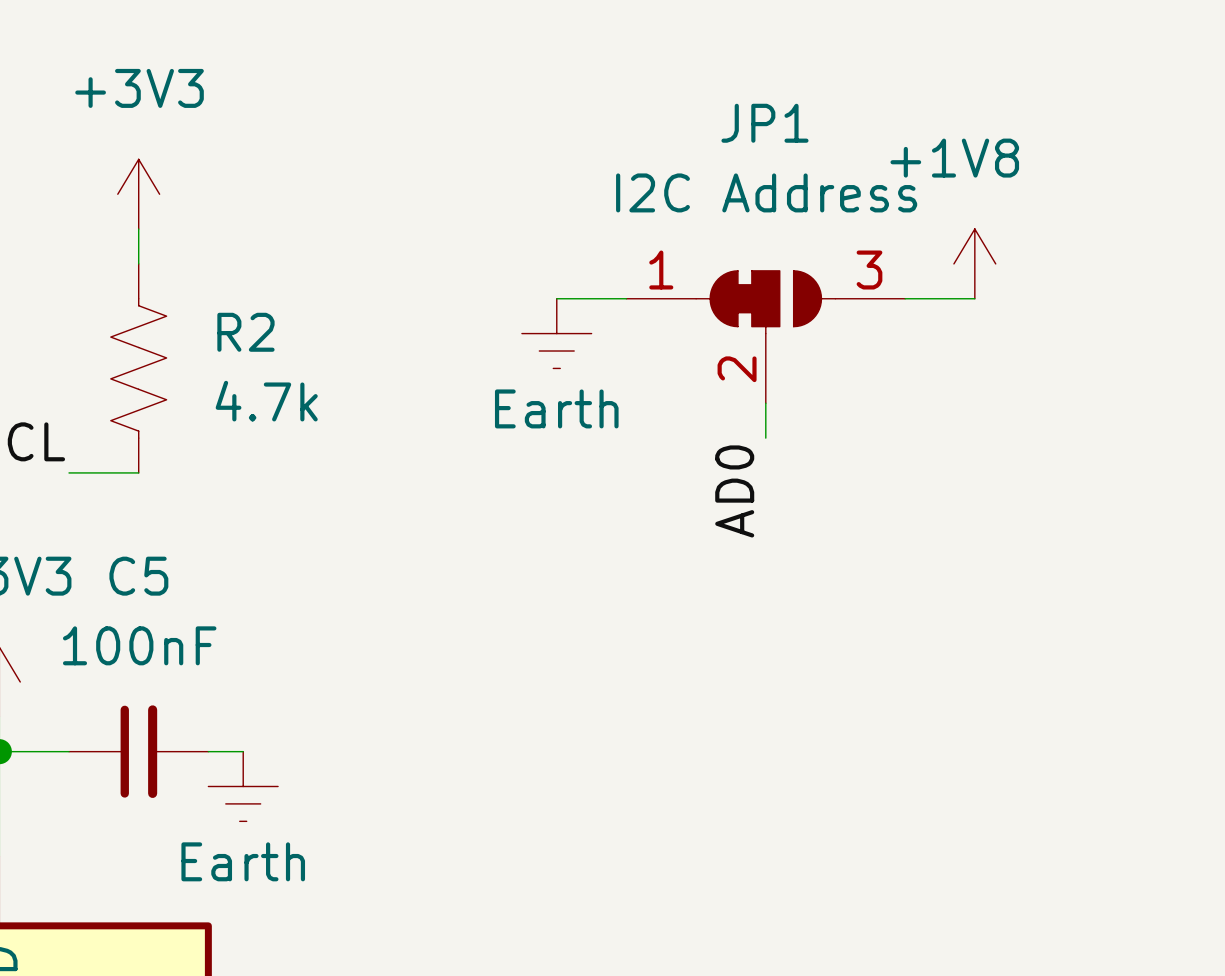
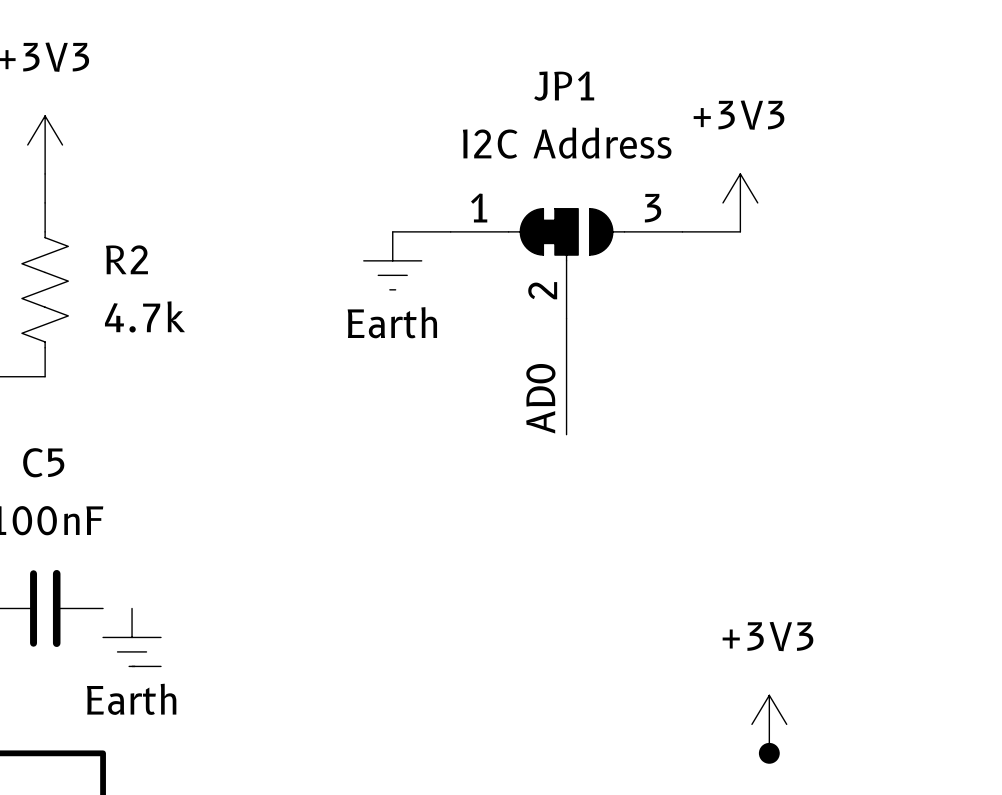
power symbol: +1V8 (974, 263) -> +3V3 (740, 202)
wire: none -> (566, 347) (566, 434)
label position: AD0 (734, 491) -> AD0 (540, 398)
wire: (208, 751) (243, 751) -> (132, 666) (160, 666)
power symbol: none -> +3V3 (769, 724)
junction: none -> (769, 753)

